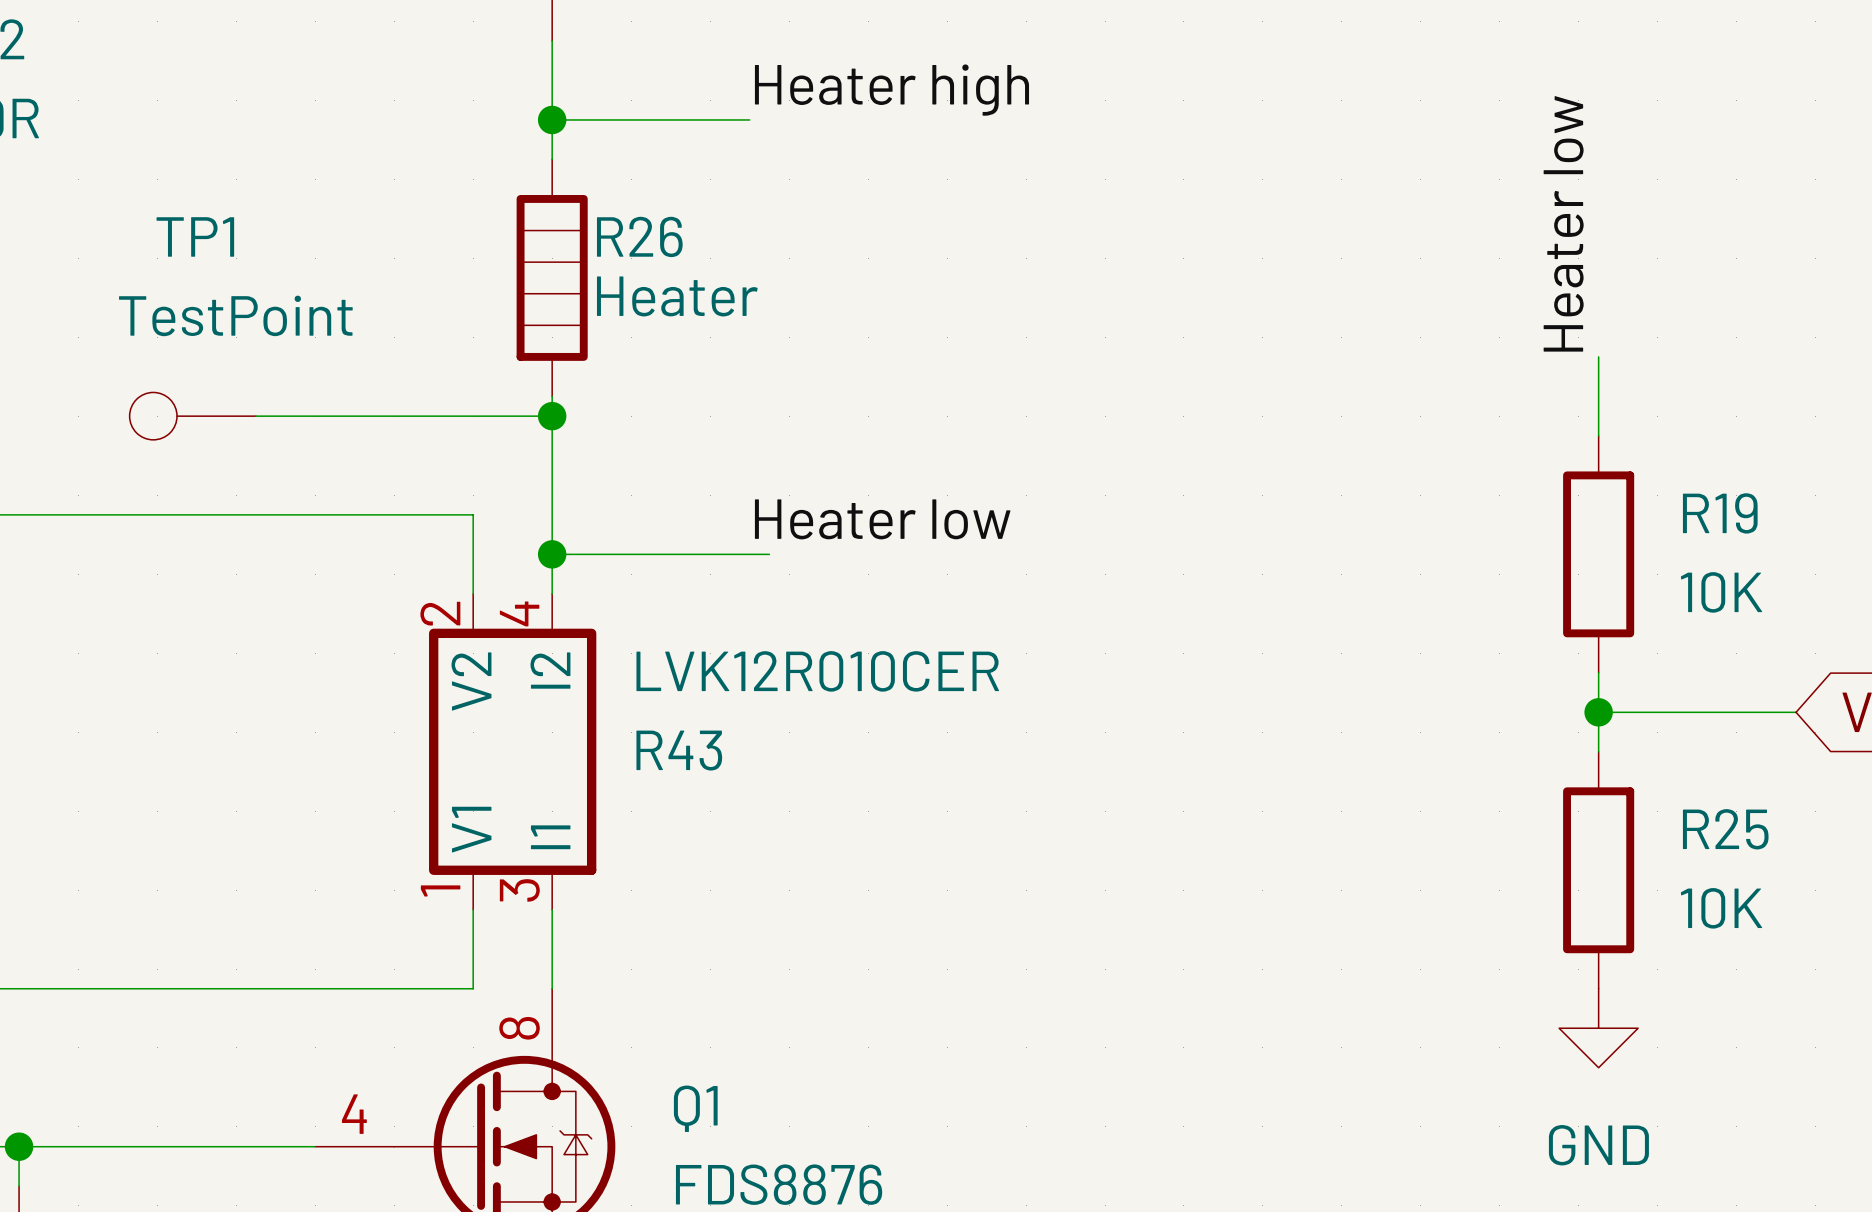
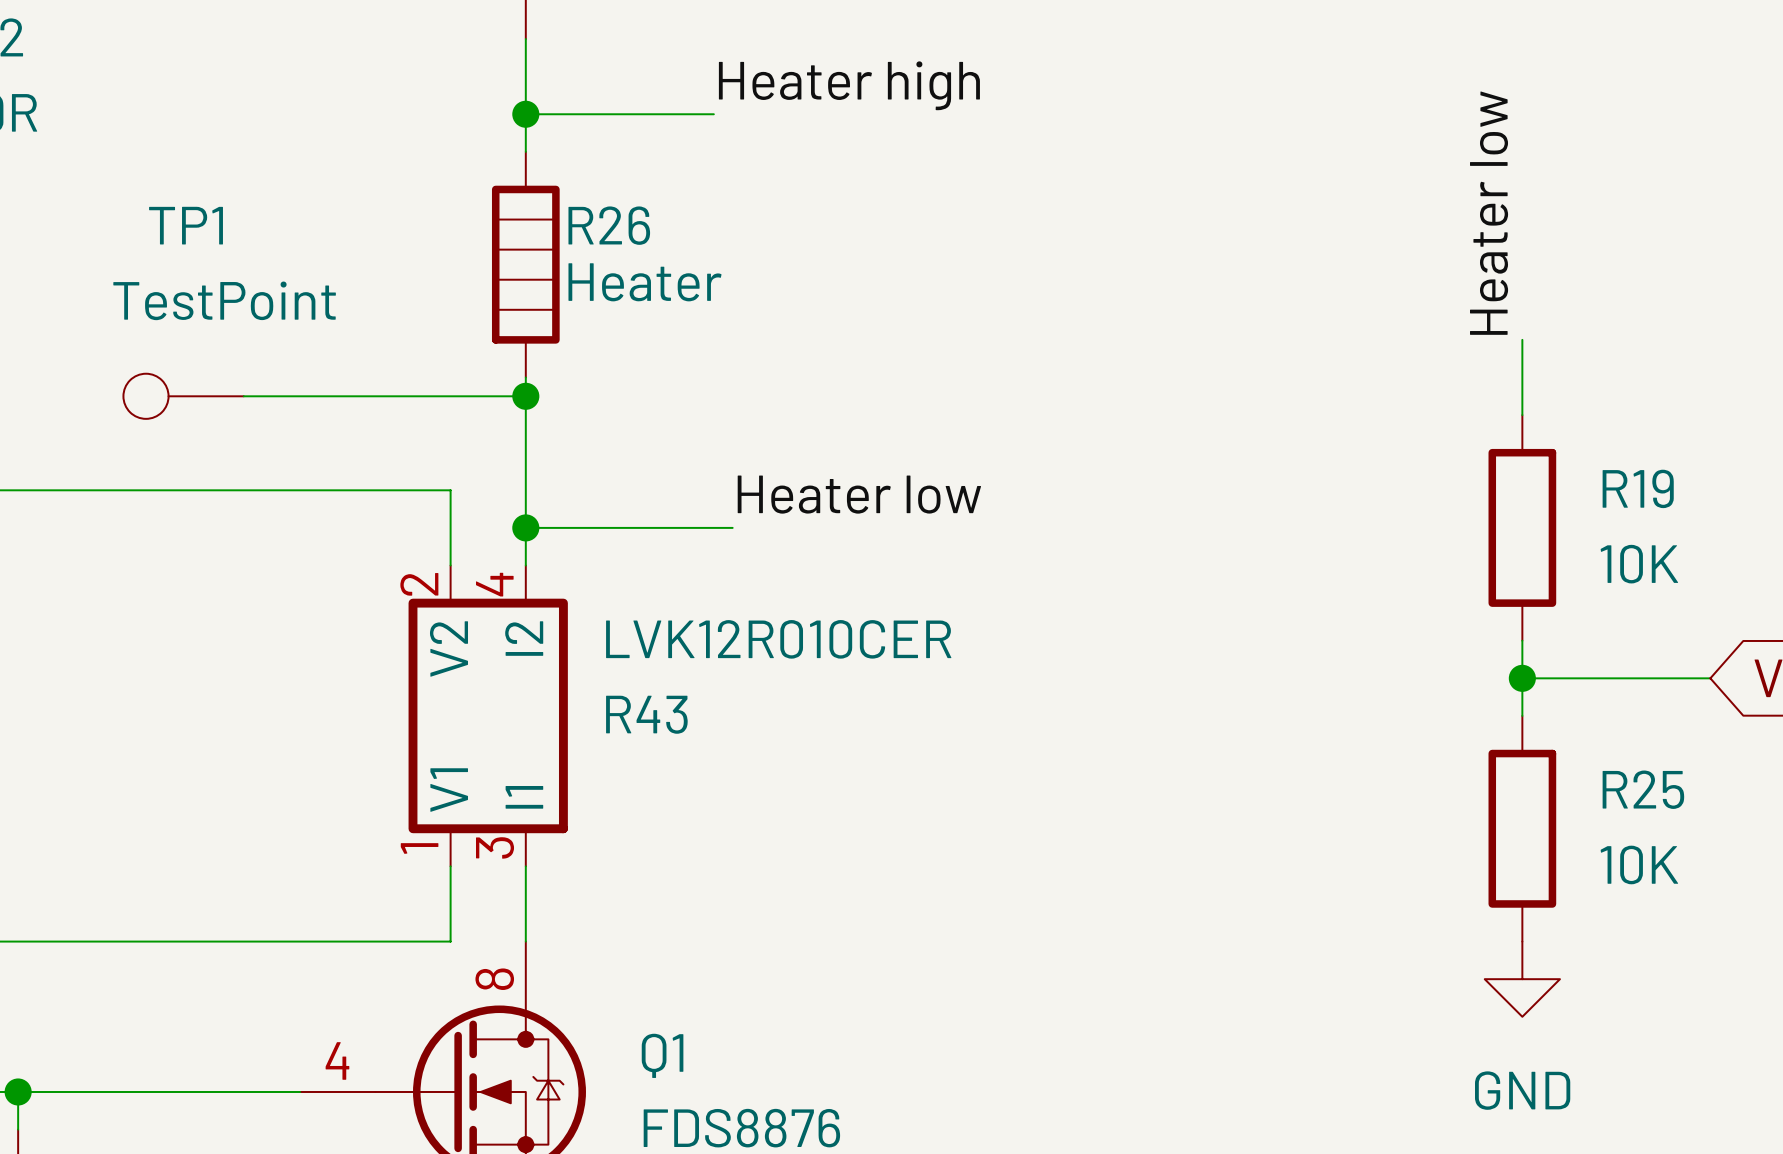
label position: Heater low (882, 519) -> Heater low (859, 494)

